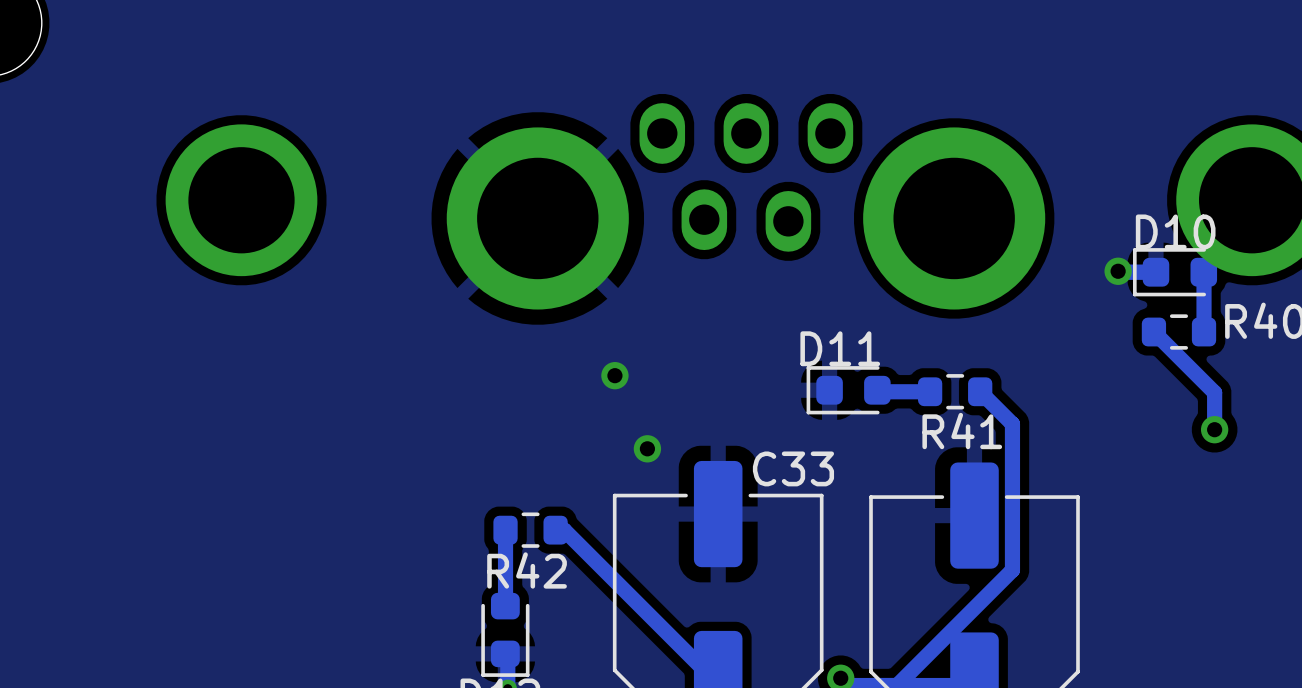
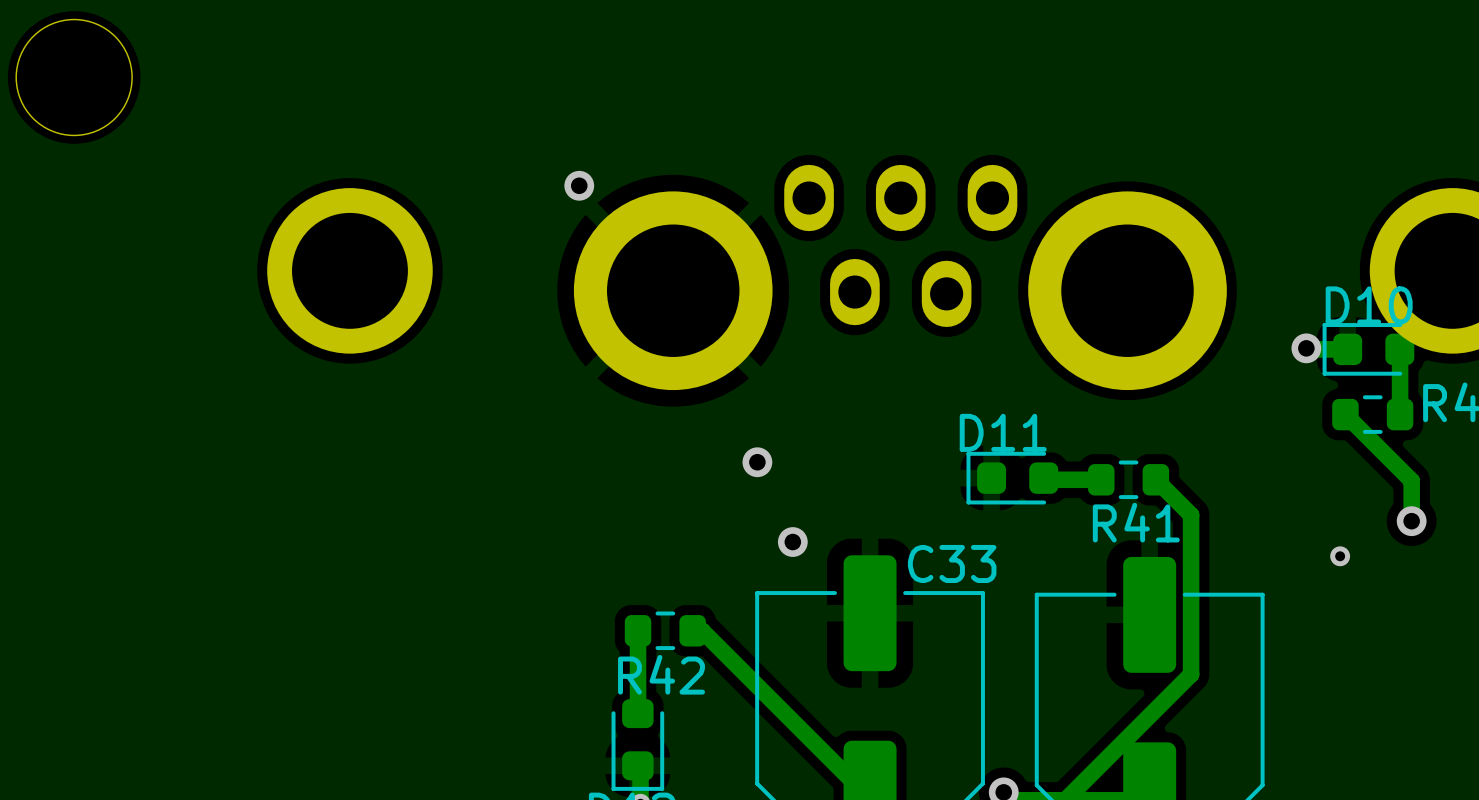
via: none -> (579, 185)
via: none -> (1340, 556)

